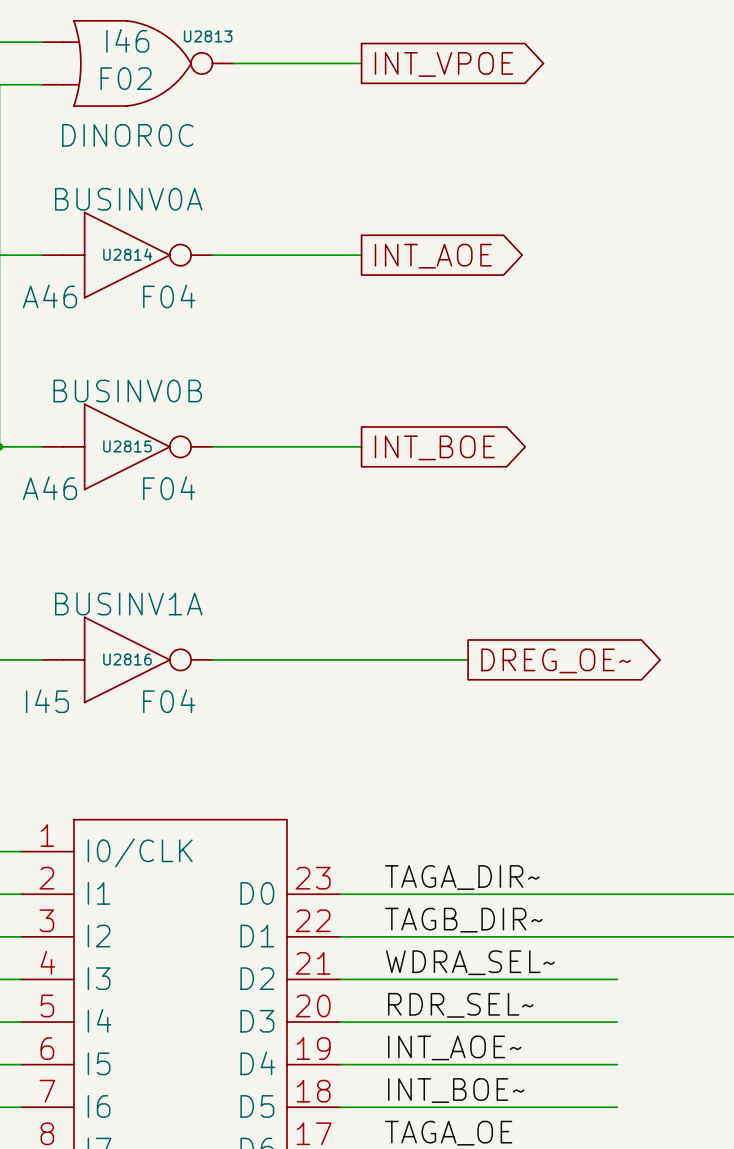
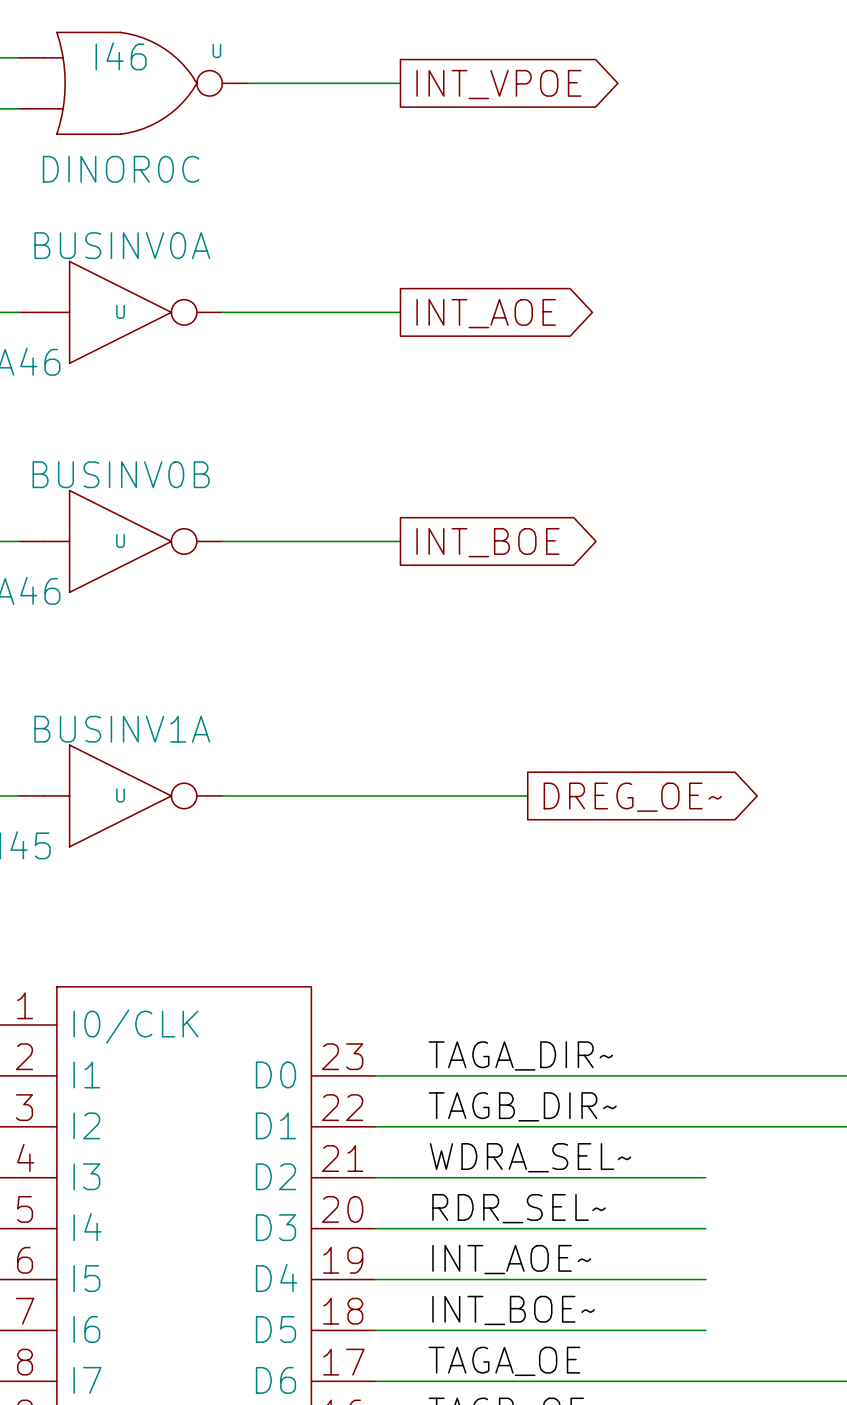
U2813 name: U2813 (208, 36) -> U (216, 51)
U2813 value: F02 (126, 78) -> none
U2814 name: U2814 (127, 254) -> U (120, 311)
U2814 value: F04 (169, 296) -> none
U2815 name: U2815 (127, 446) -> U (120, 540)
U2815 value: F04 (169, 488) -> none
U2816 name: U2816 (127, 659) -> U (120, 795)
U2816 value: F04 (169, 701) -> none

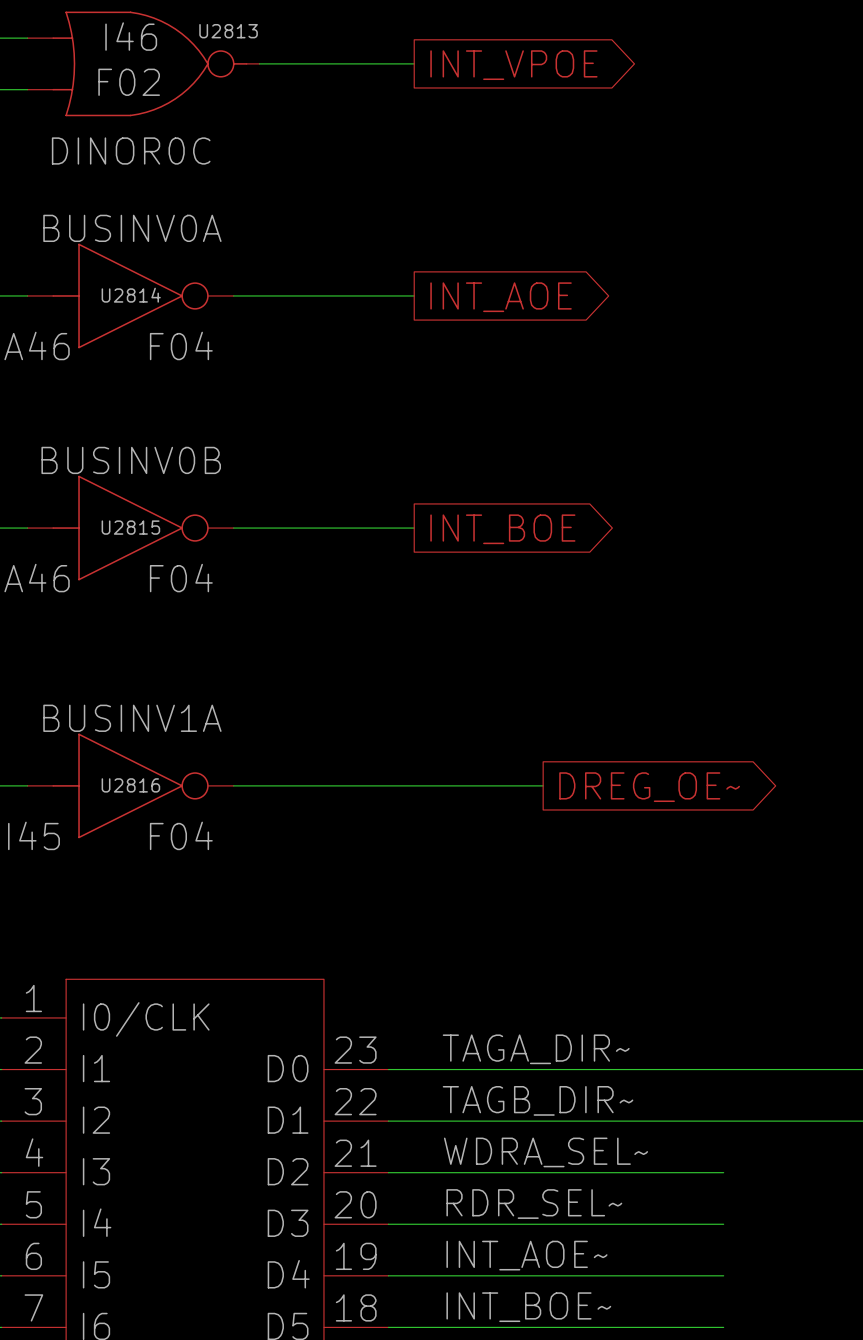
U name: U (216, 51) -> U2813 (228, 31)
U value: none -> F02 (129, 82)
U name: U (120, 311) -> U2814 (131, 295)
U value: none -> F04 (181, 345)
U name: U (120, 540) -> U2815 (130, 527)
U value: none -> F04 (181, 578)
U name: U (120, 795) -> U2816 (130, 785)
U value: none -> F04 (181, 835)

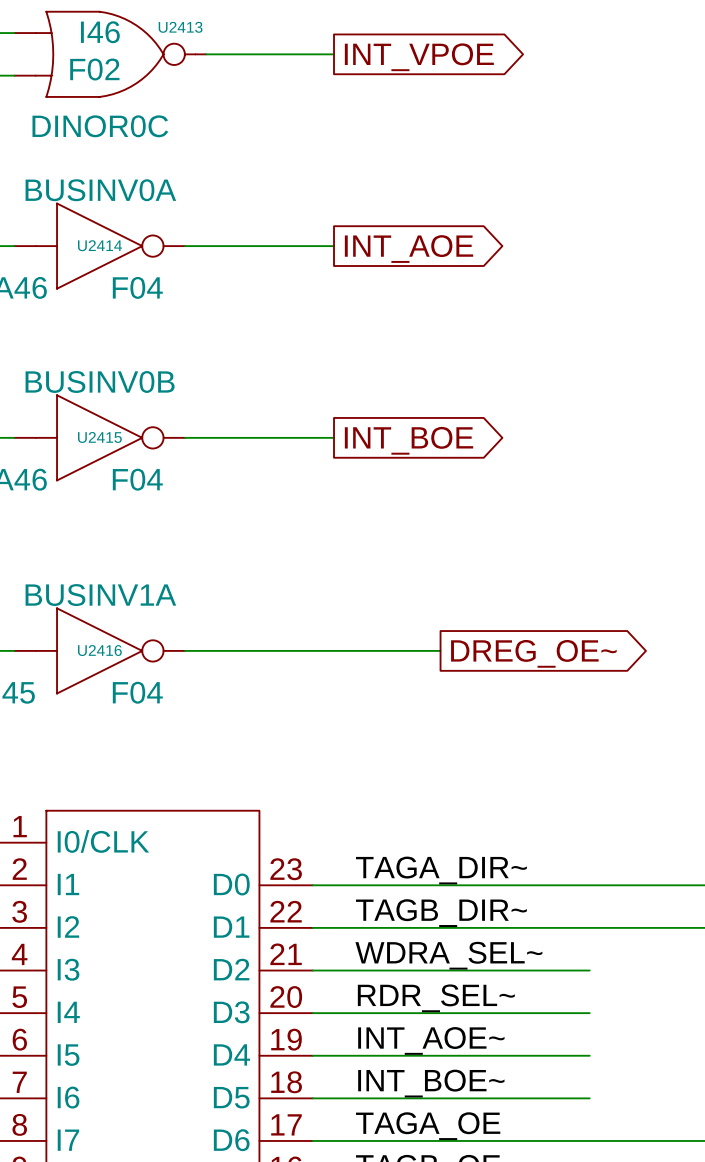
U2813 name: U2813 (228, 31) -> U2413 (180, 27)
U2814 name: U2814 (131, 295) -> U2414 (100, 245)
U2815 name: U2815 (130, 527) -> U2415 (99, 437)
U2816 name: U2816 (130, 785) -> U2416 (99, 650)

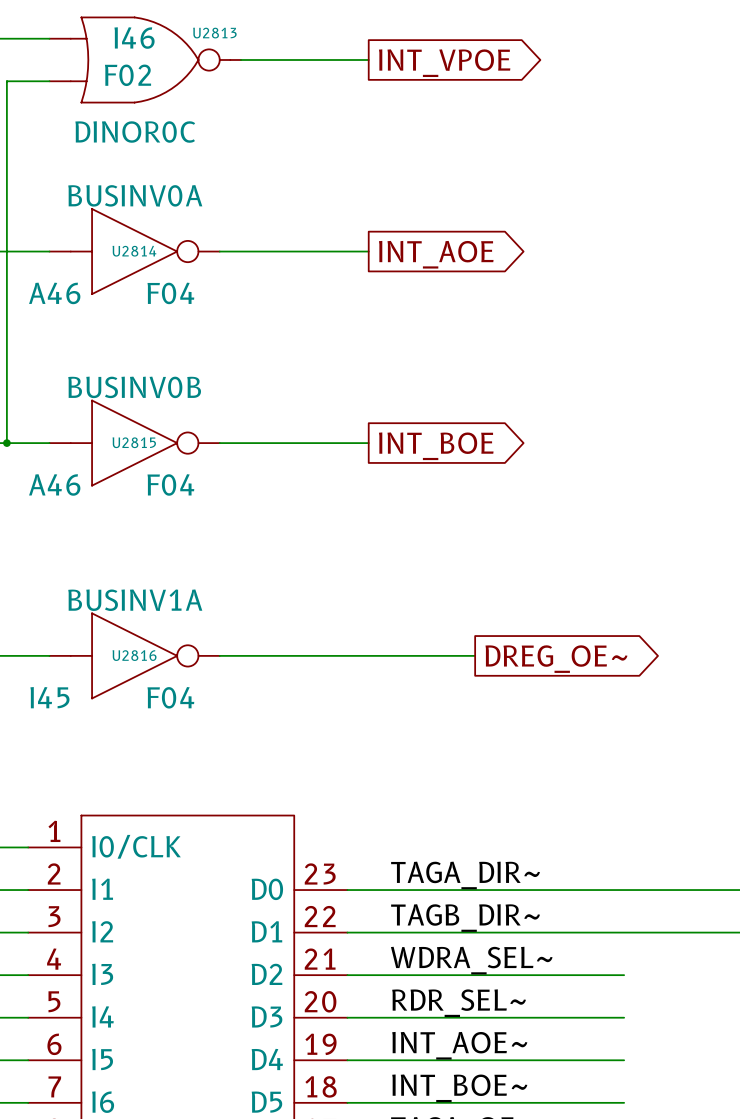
U2413 name: U2413 (180, 27) -> U2813 (214, 33)
U2414 name: U2414 (100, 245) -> U2814 (134, 251)
U2415 name: U2415 (99, 437) -> U2815 (134, 442)
U2416 name: U2416 (99, 650) -> U2816 (134, 655)

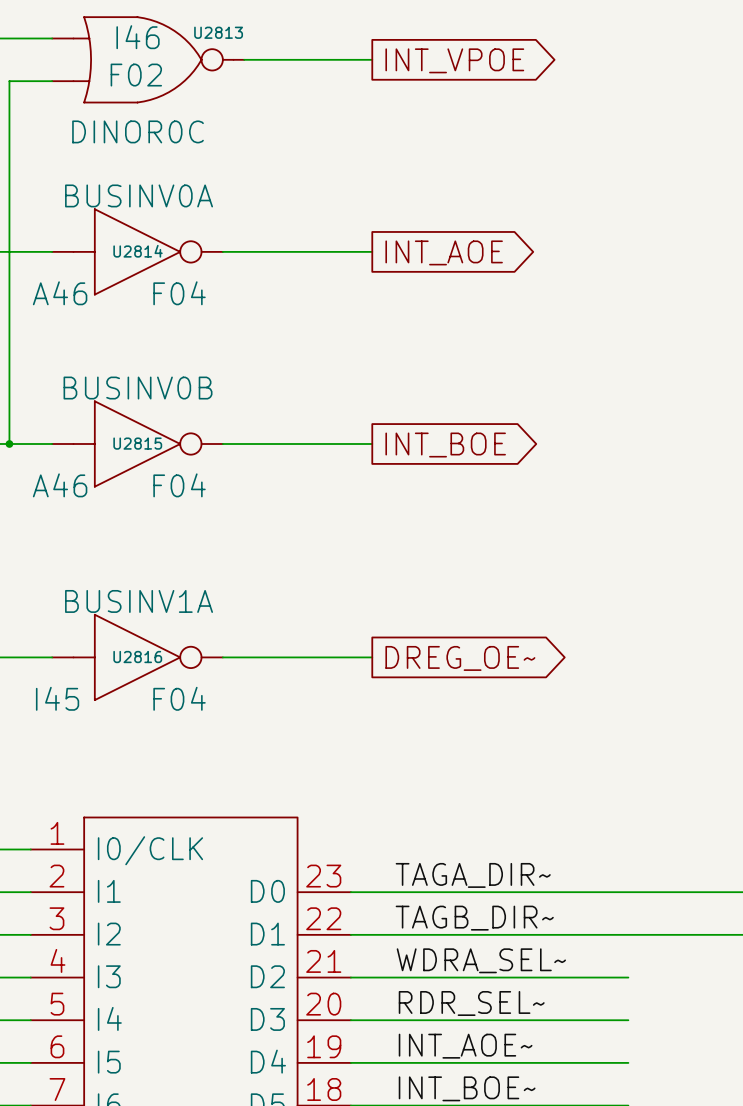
wire: (368, 655) (475, 655) -> none
global label position: DREG_OE~ (556, 659) -> DREG_OE~ (460, 658)

